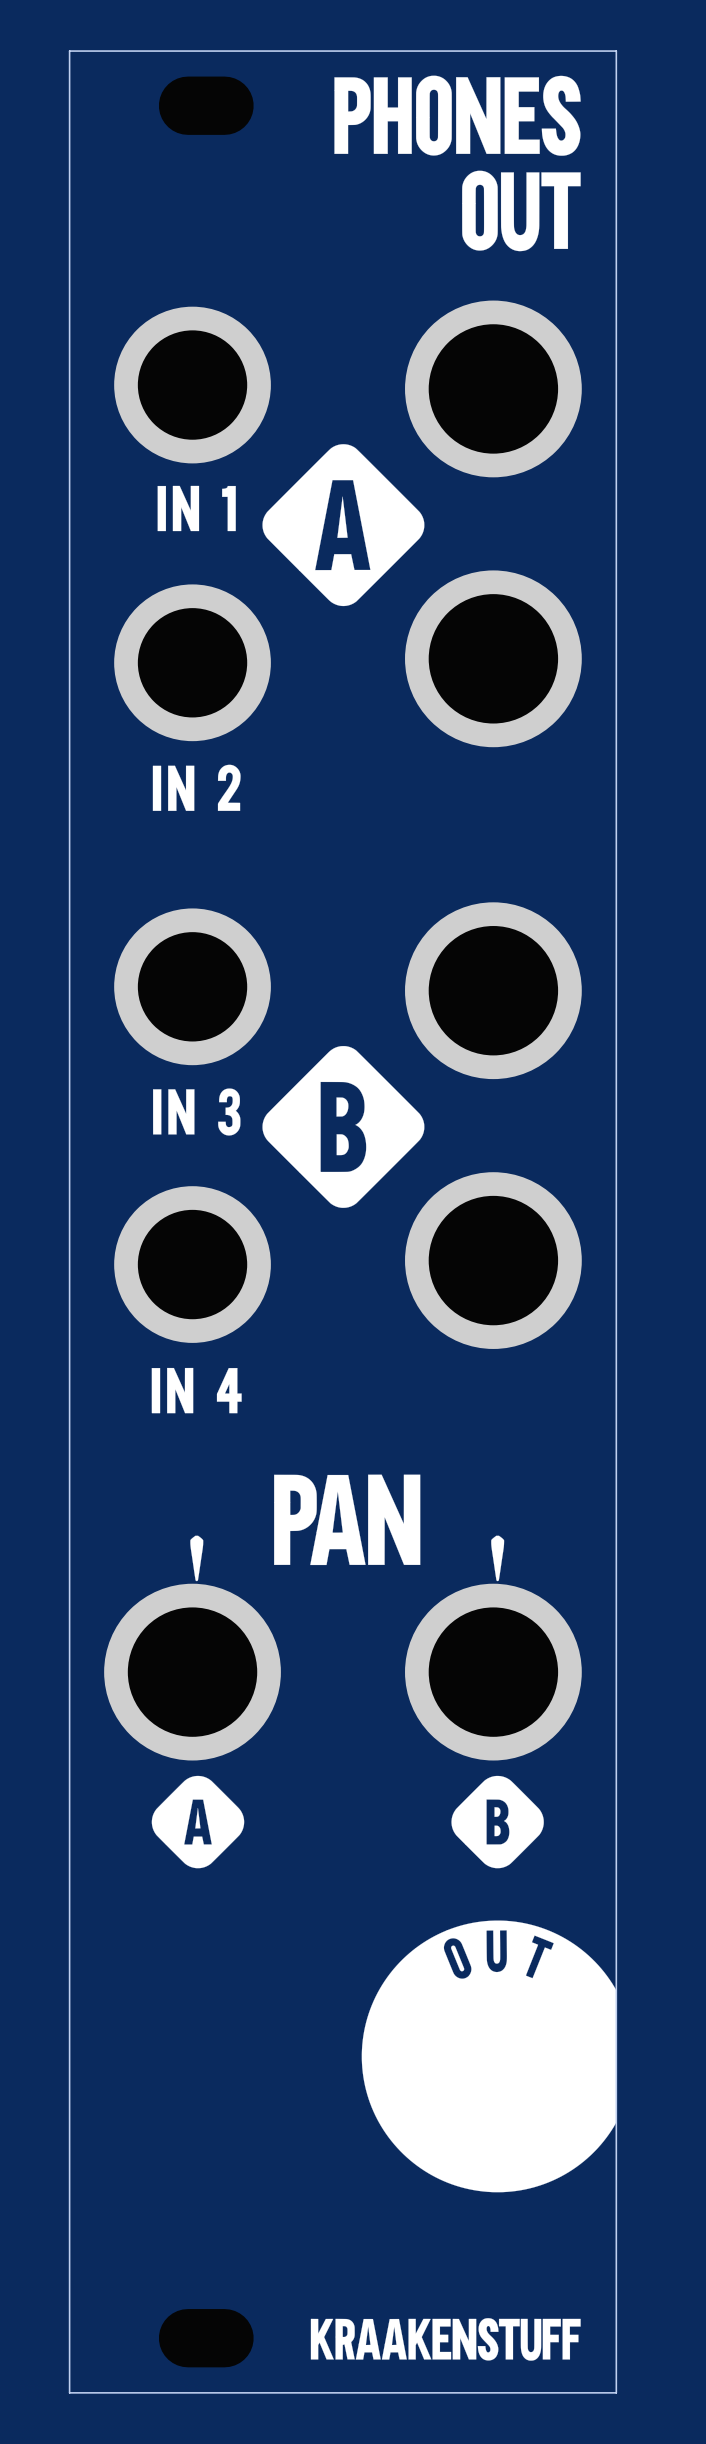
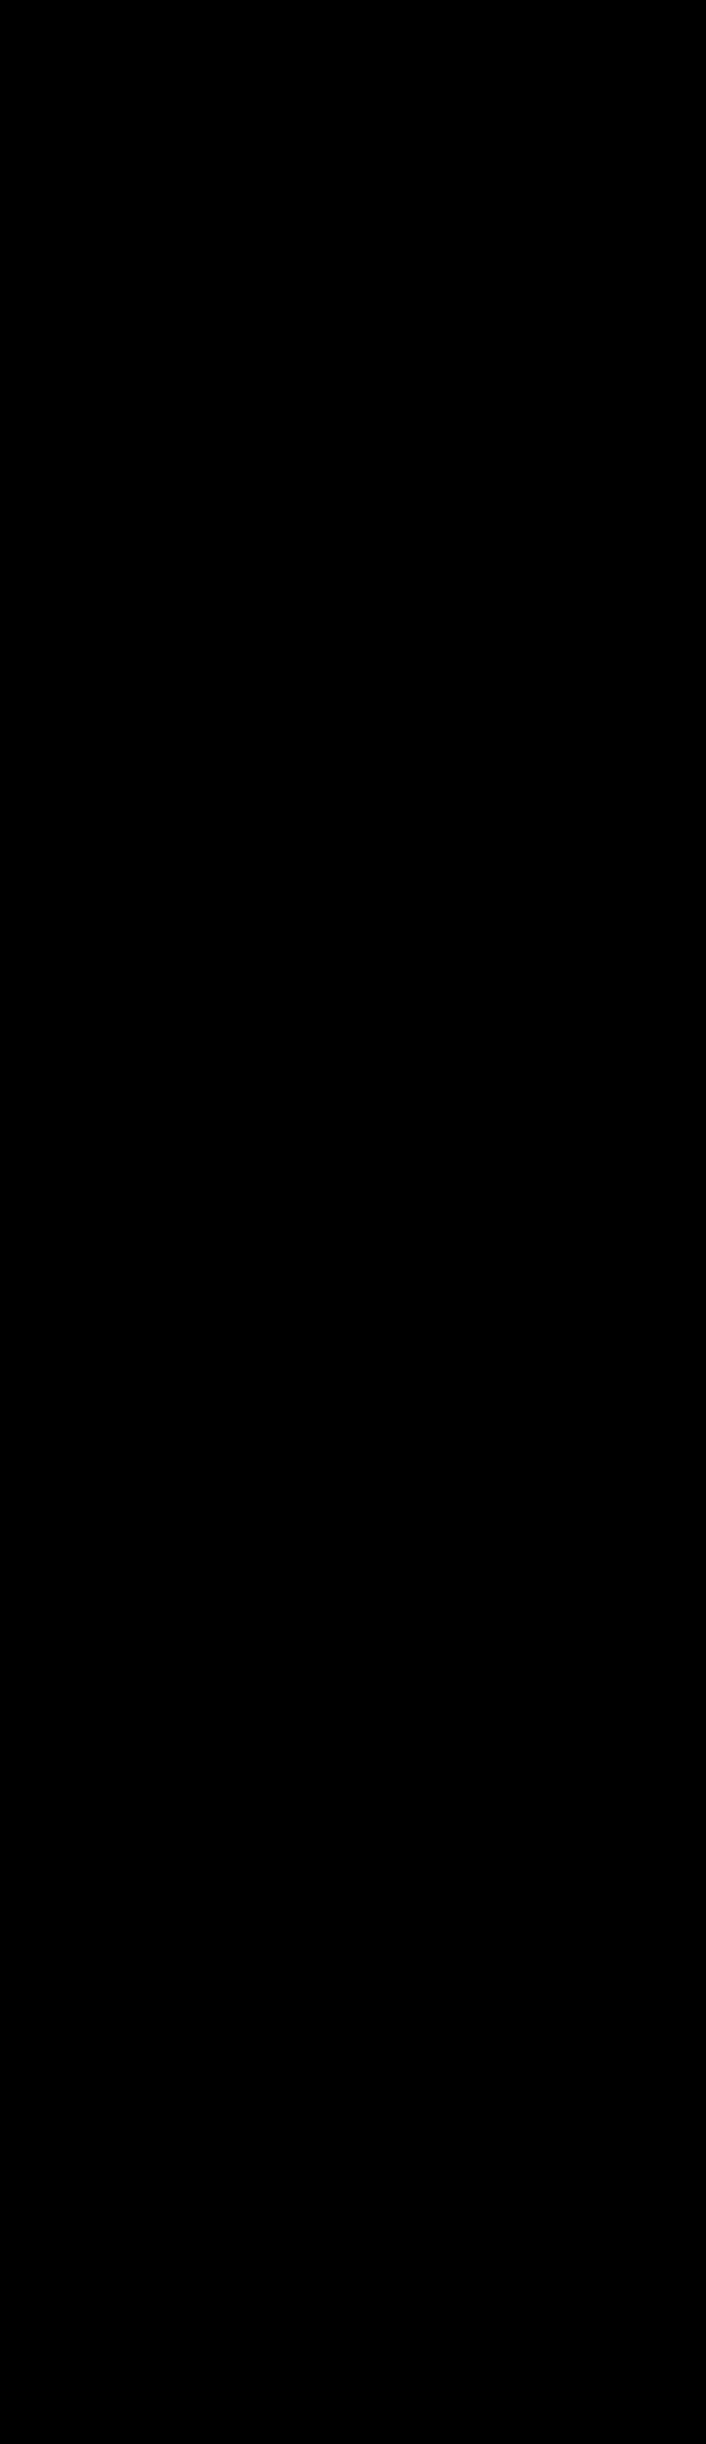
board edge: (69, 51) (616, 51) (616, 2392) (69, 2392) (69, 51) -> none
drawing: [151, 75, 617, 2361] -> none
part: (192, 385) -> none
part: (493, 388) -> none
part: (493, 658) -> none
part: (192, 662) -> none
part: (192, 986) -> none
part: (493, 990) -> none
part: (493, 1260) -> none
part: (192, 1264) -> none
part: (192, 1672) -> none
part: (493, 1672) -> none

